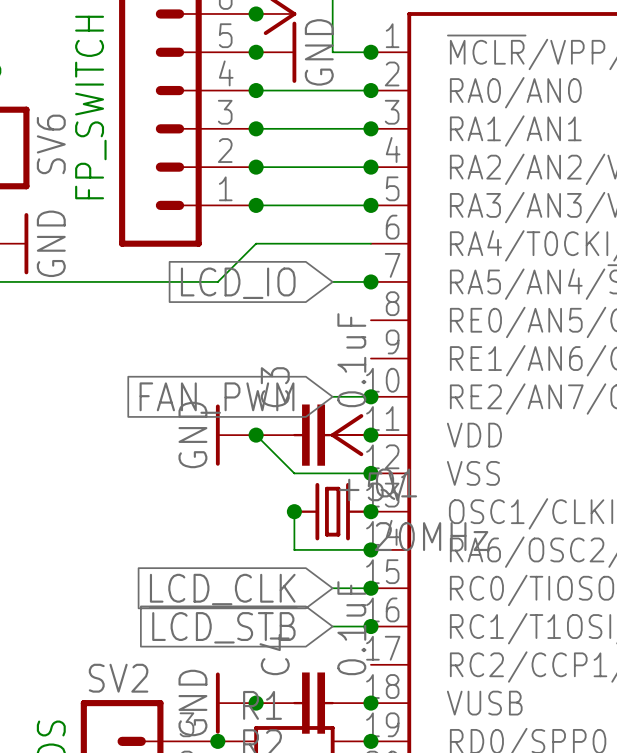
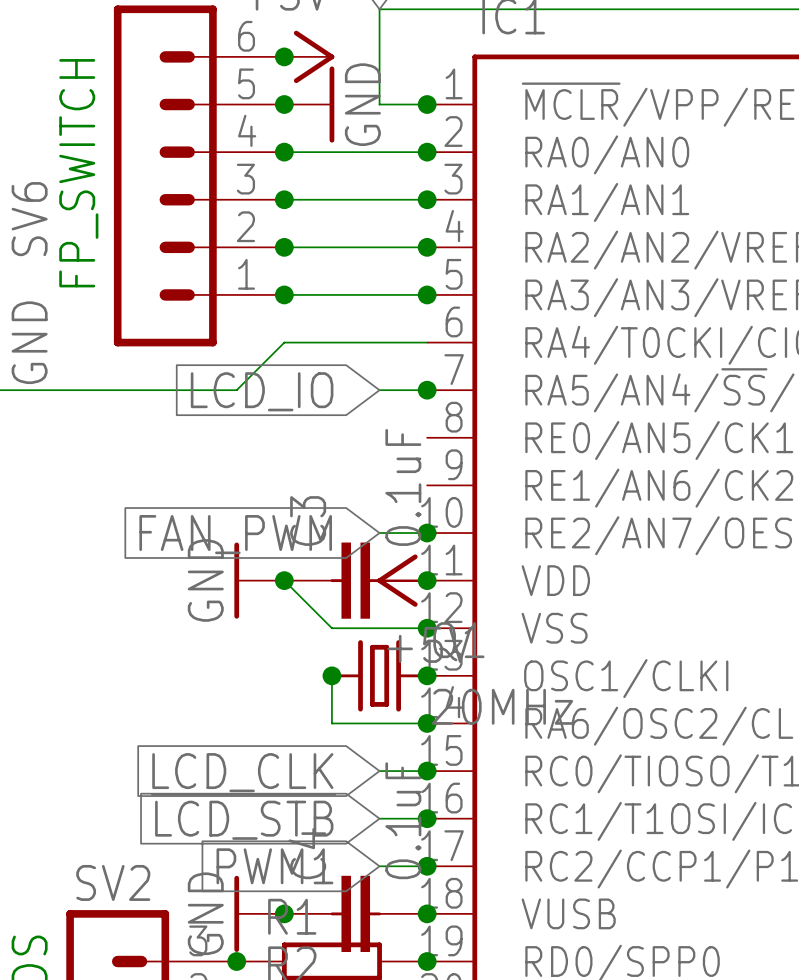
global label: none -> PWM1 (274, 866)
wire: none -> (379, 866) (427, 866)
junction: none -> (427, 866)

